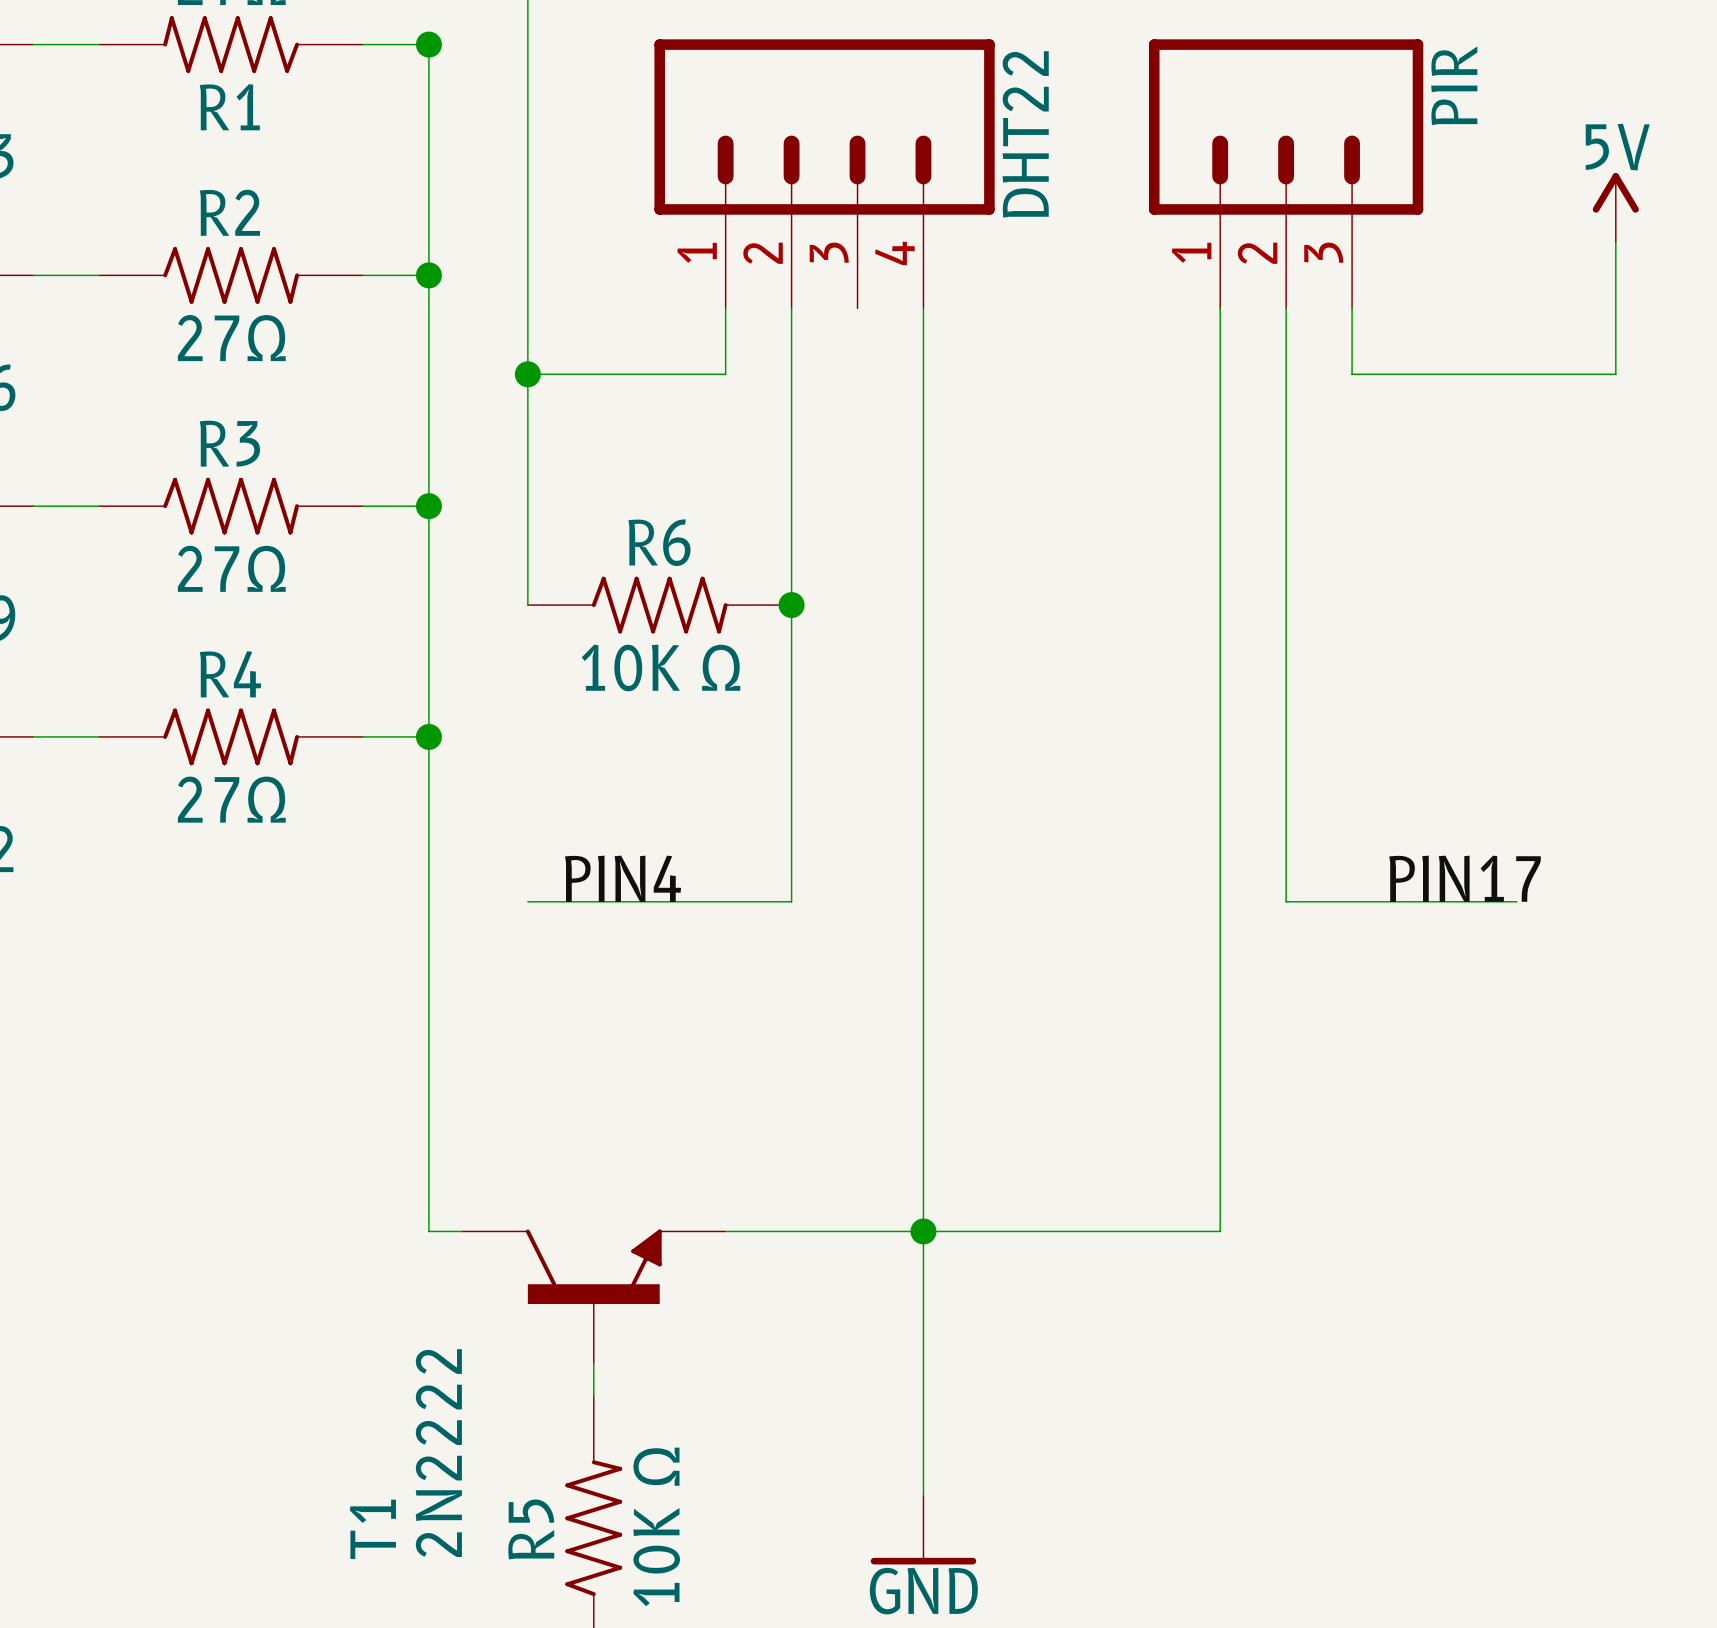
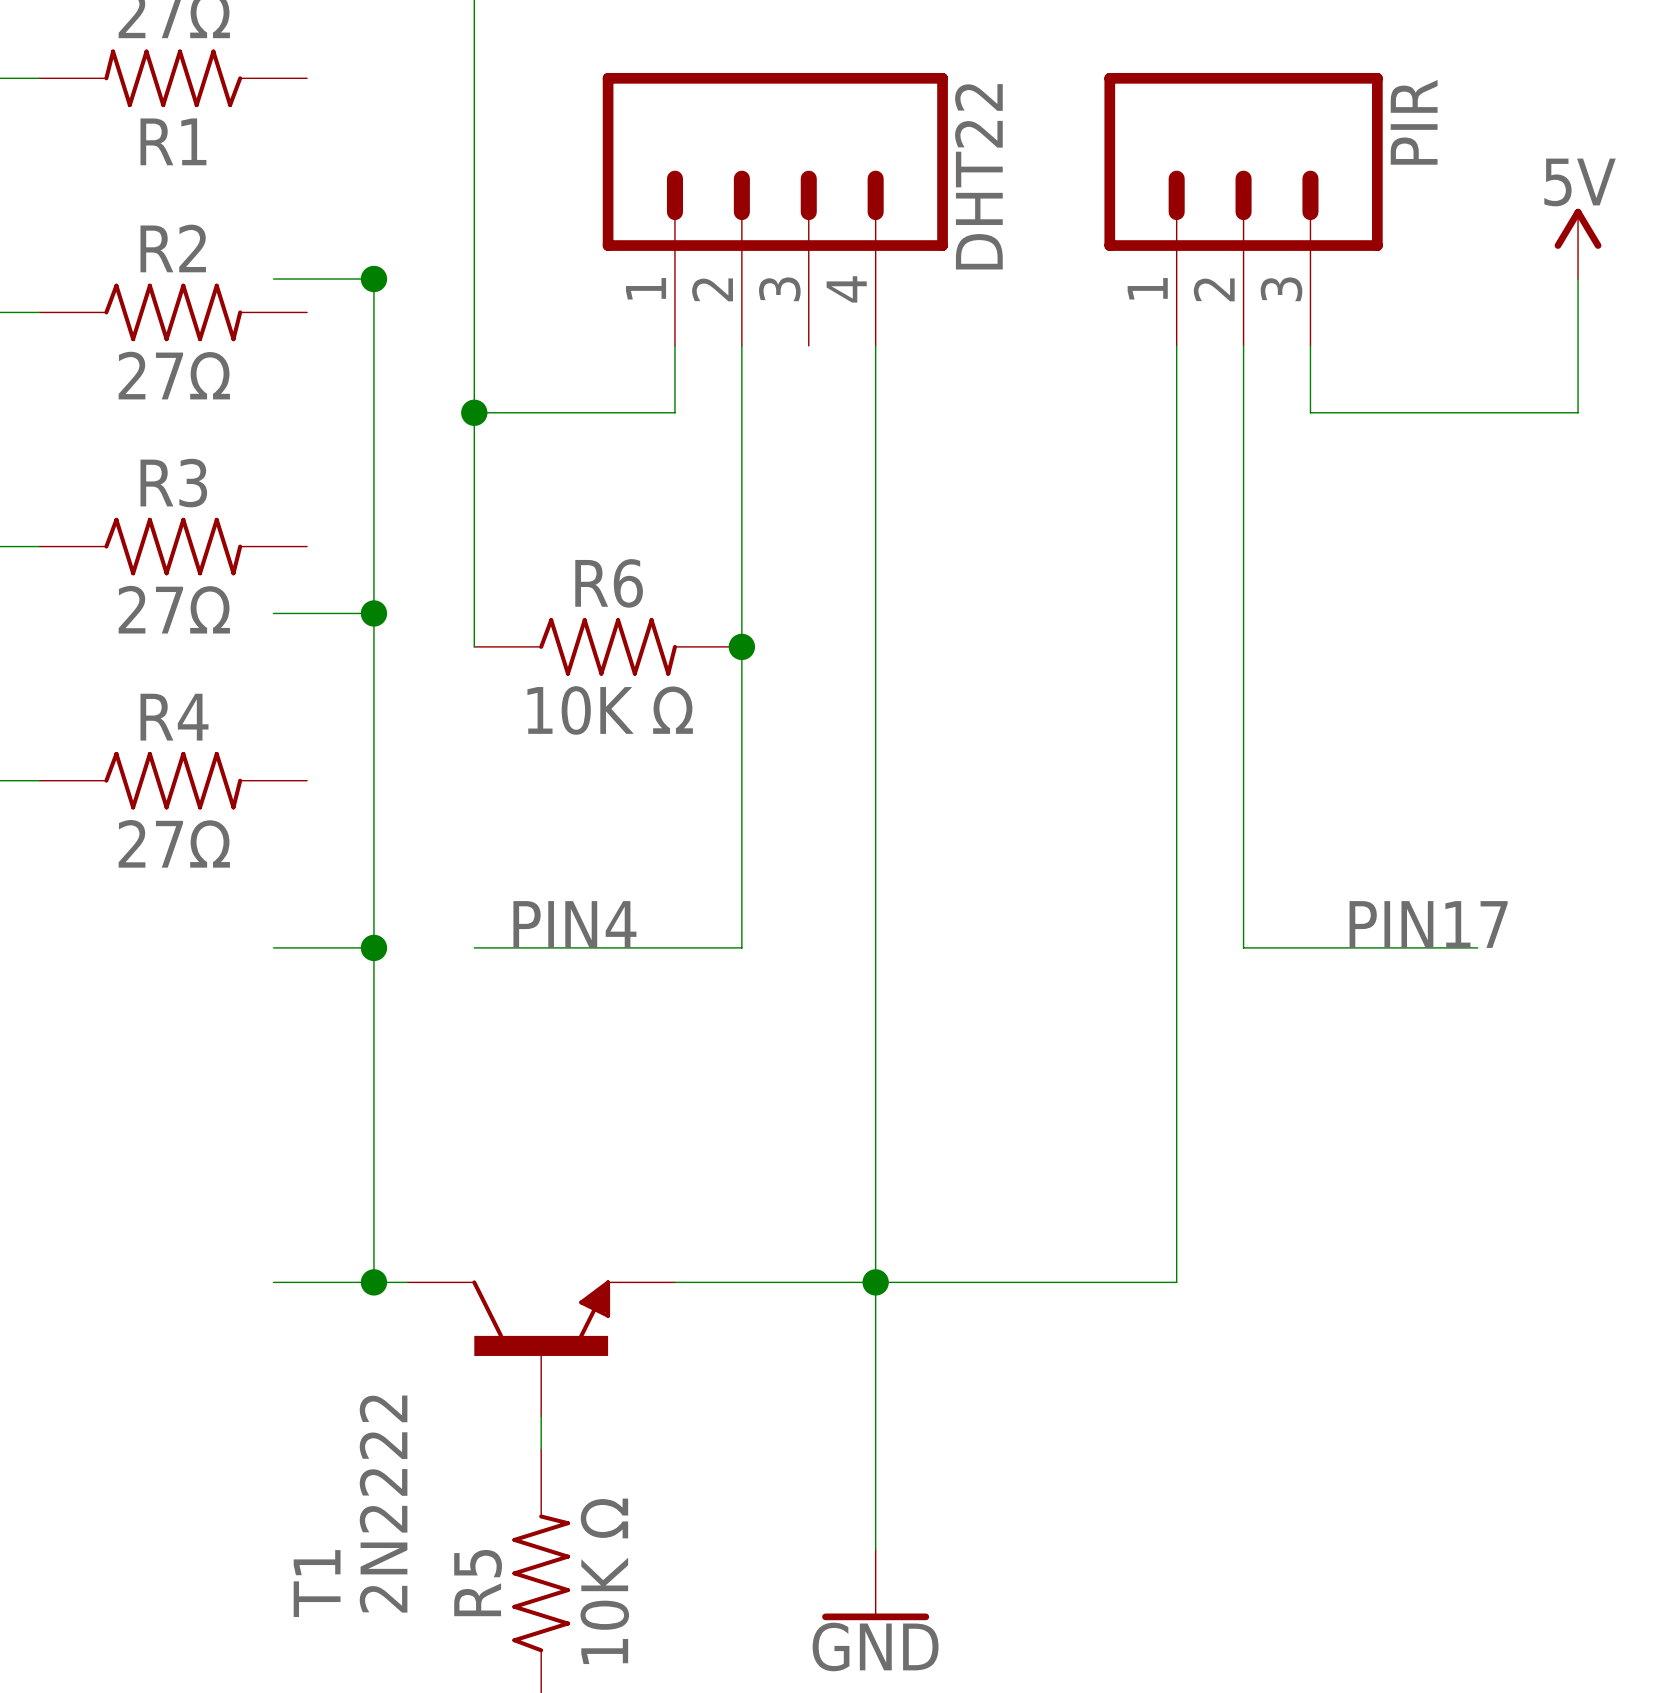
wire: (363, 44) (428, 44) (428, 242) -> (273, 278) (373, 278)
junction: (428, 44) -> none
wire: (363, 275) (428, 275) -> none
junction position: (428, 275) -> (373, 278)
wire: (363, 506) (428, 506) -> none
junction position: (428, 506) -> (373, 613)
wire: none -> (273, 613) (373, 613)
wire: (363, 736) (428, 736) -> none
junction: (428, 736) -> none
wire: none -> (273, 947) (373, 947)
junction: none -> (373, 947)
wire: none -> (273, 1282) (373, 1282)
junction: none -> (373, 1282)

